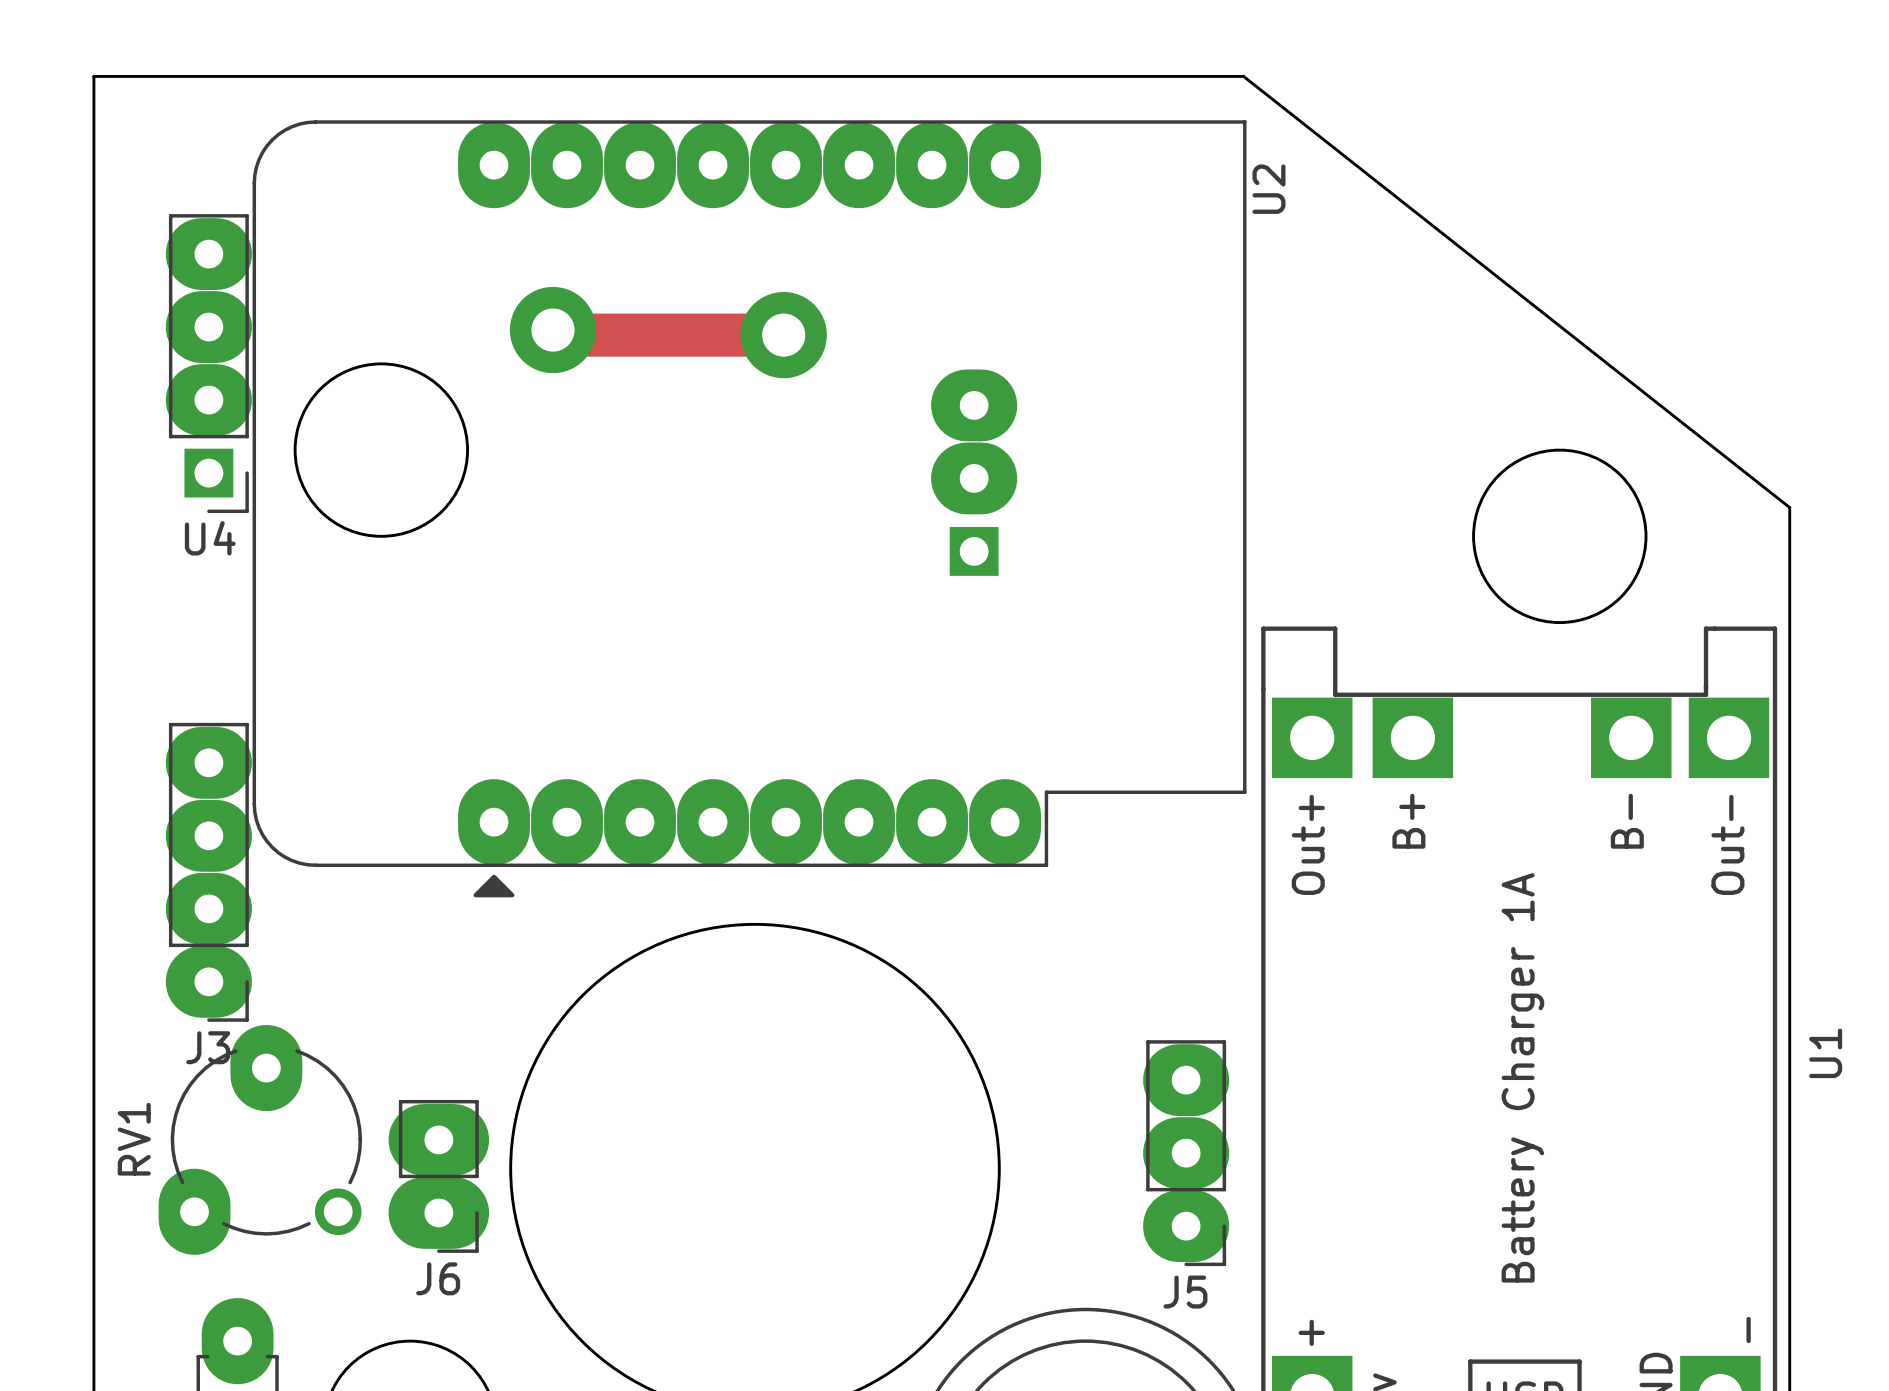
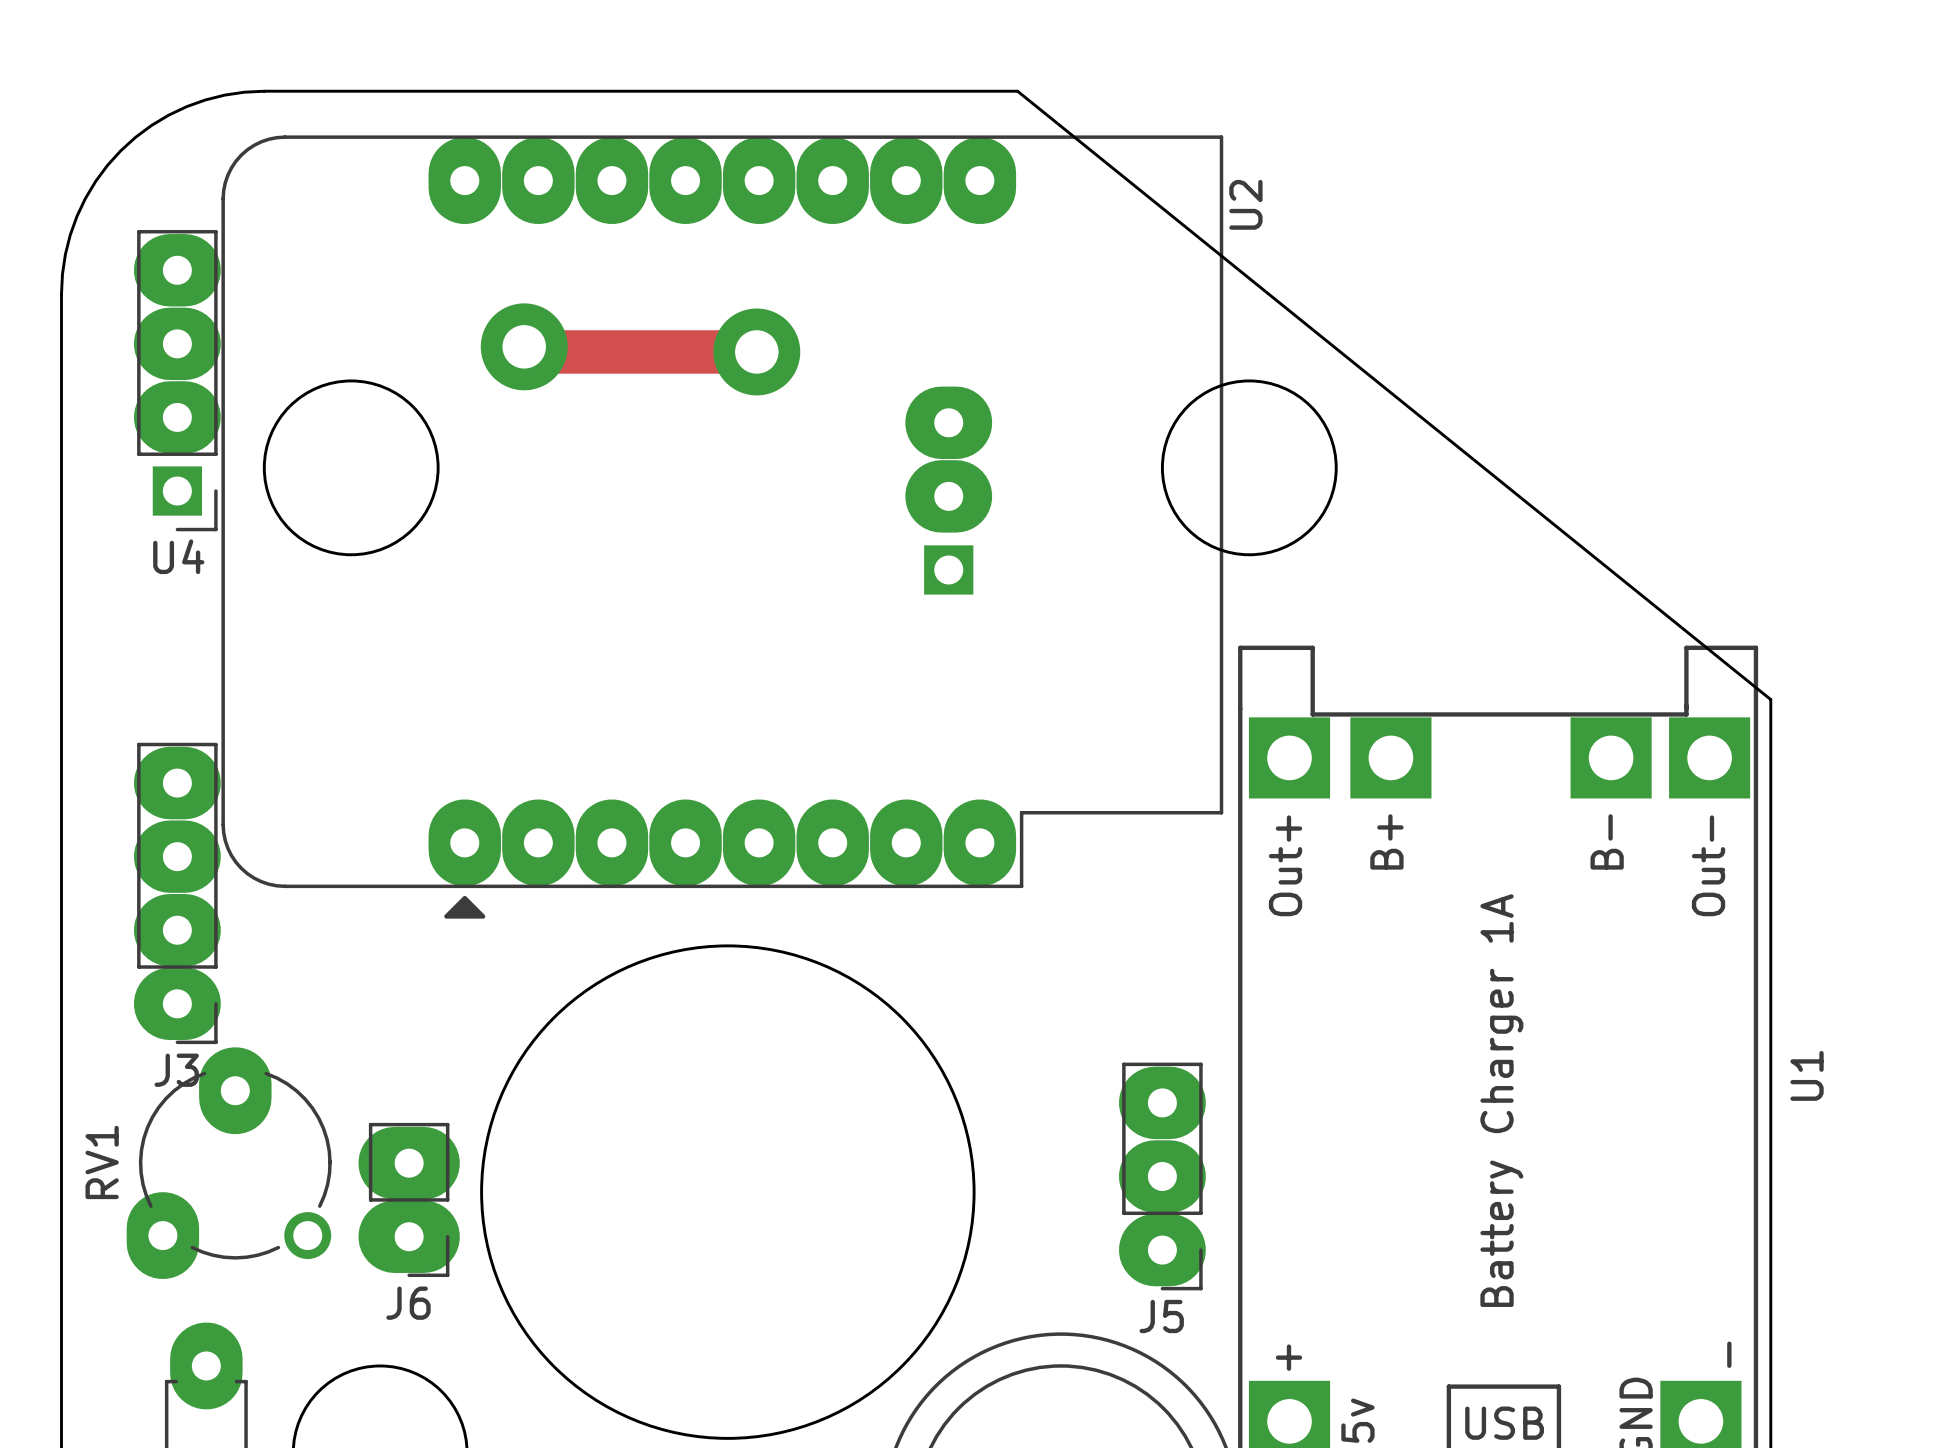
board edge: (295, 76) (93, 76) (93, 277) -> (264, 91) (224, 95) (186, 106) (151, 125) (120, 150) (95, 181) (76, 216) (65, 254) (61, 294)
board edge: (1042, 76) (1243, 76) (1789, 507) (1789, 680) -> (1017, 91) (1770, 699)
round board edge position: (1559, 536) -> (1249, 467)

